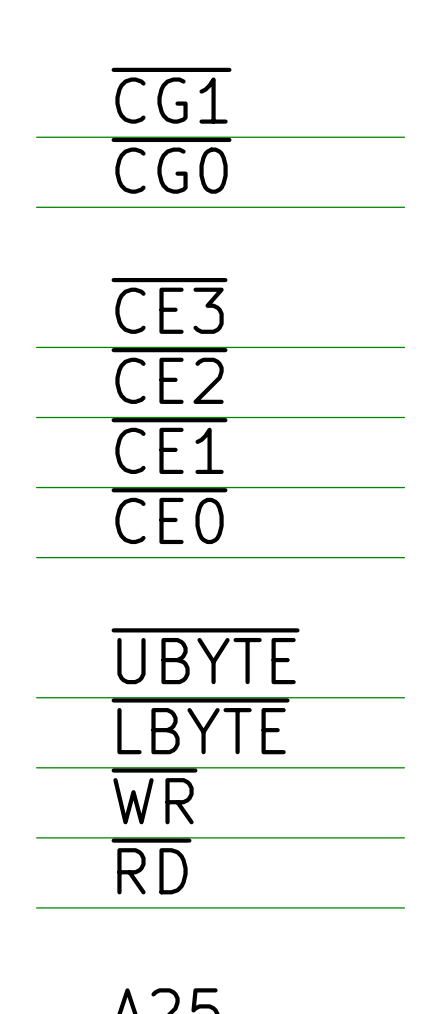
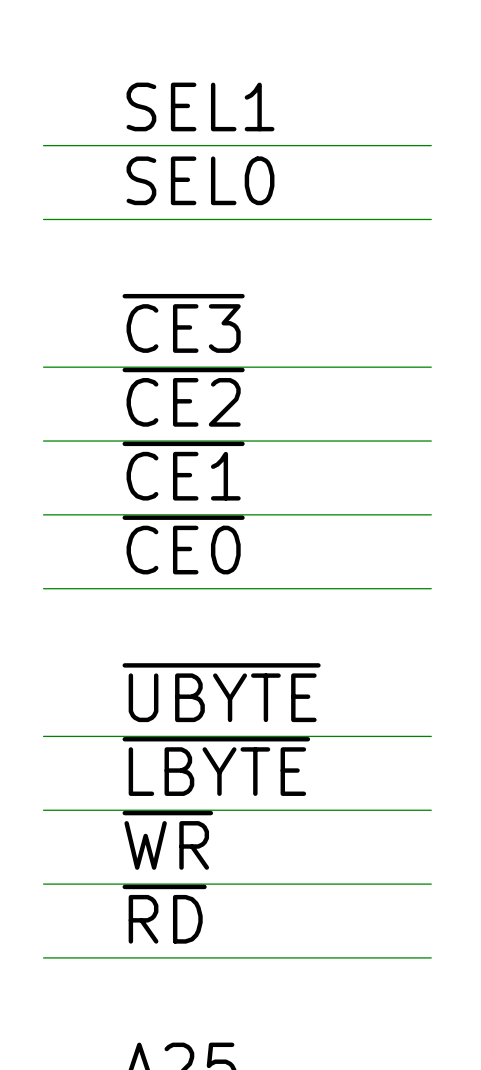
label: ~{CG1} (171, 95) -> SEL1 (200, 106)
label: ~{CG0} (171, 165) -> SEL0 (200, 180)

